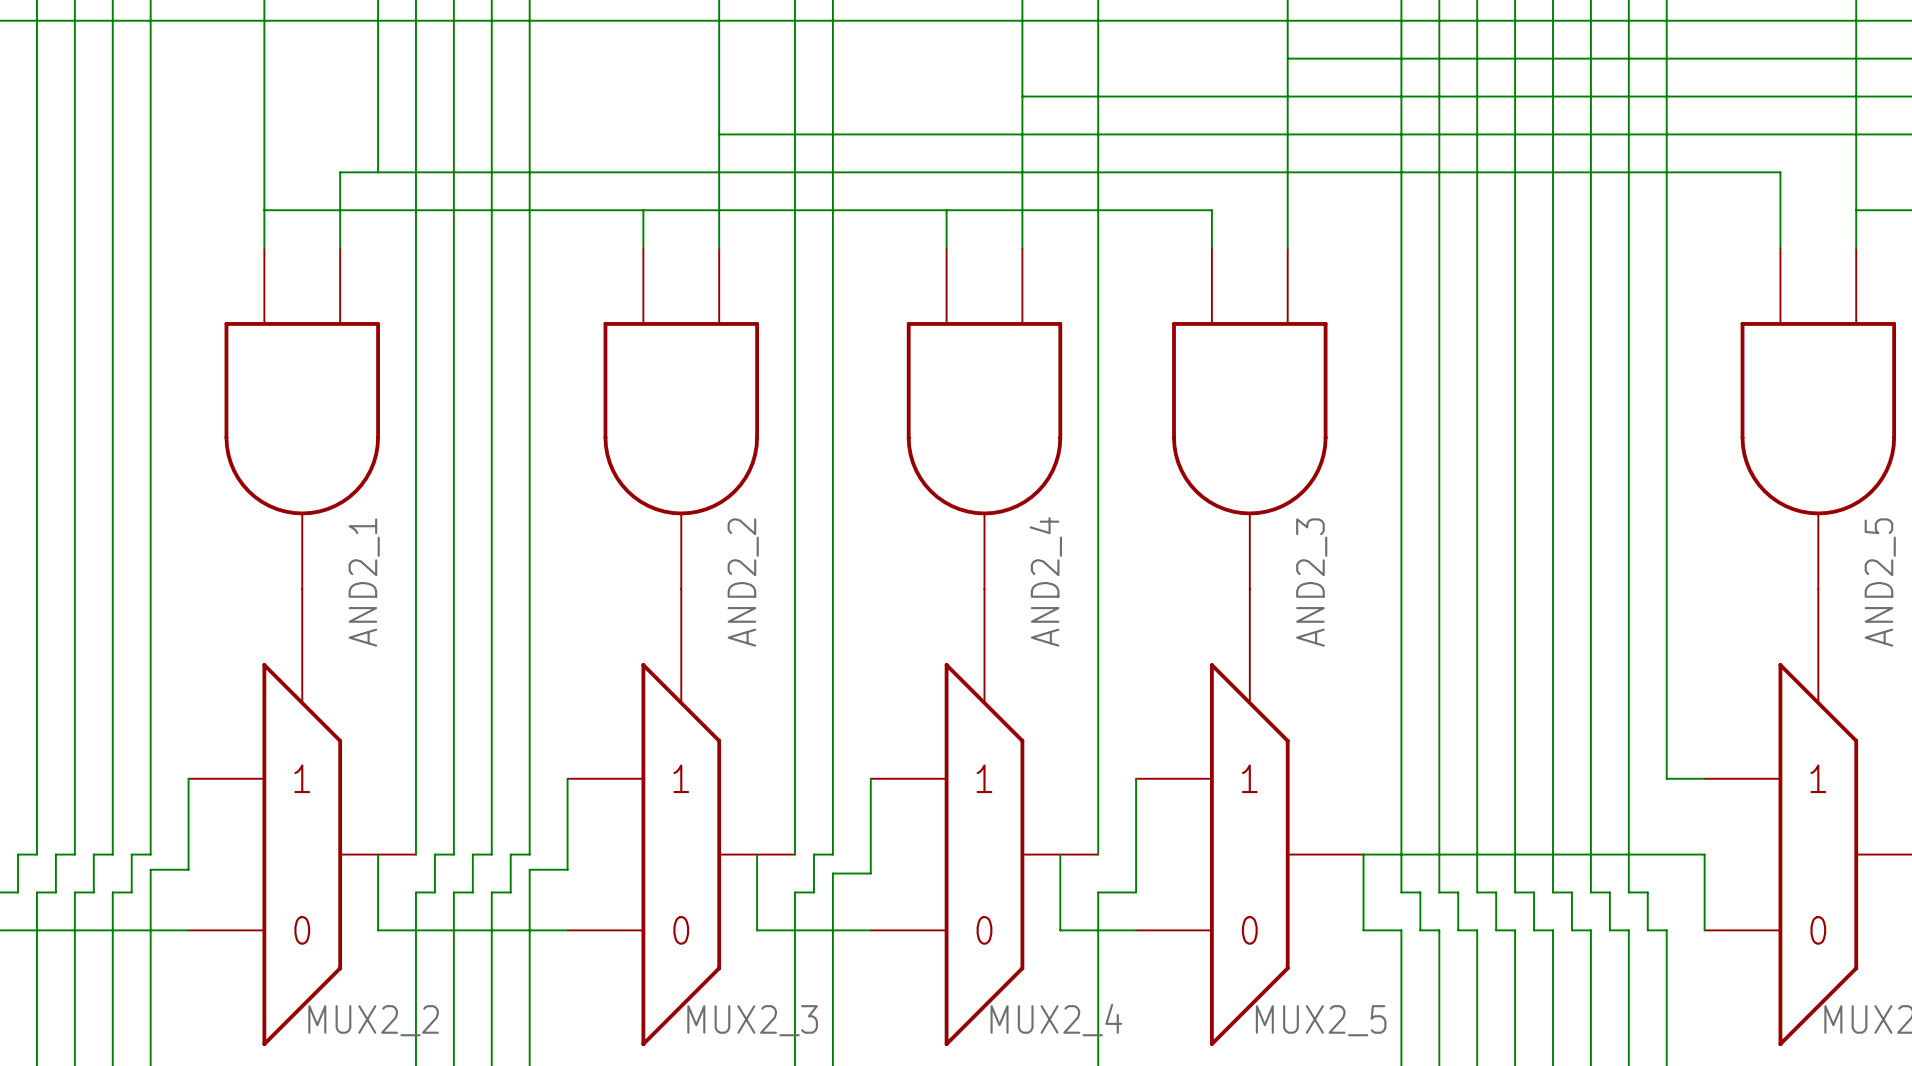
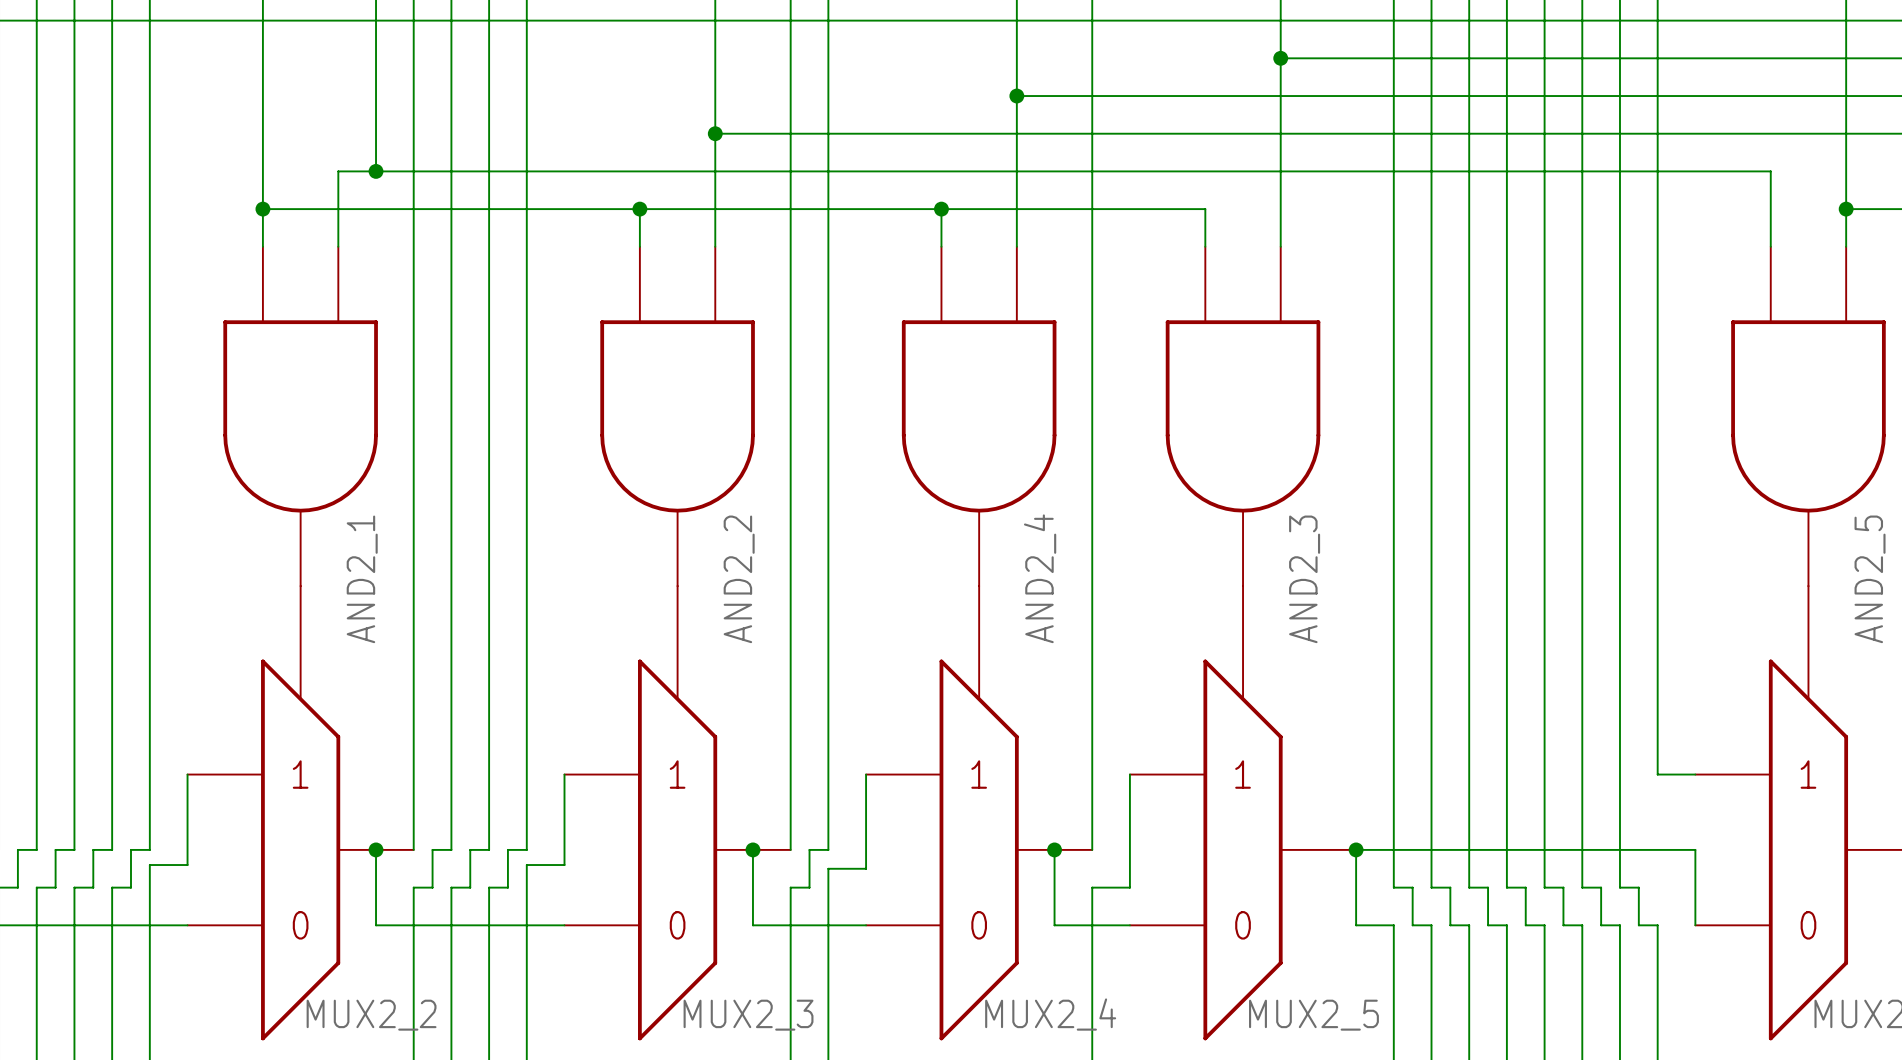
junction: none -> (1280, 58)
junction: none -> (1016, 96)
junction: none -> (715, 133)
junction: none -> (376, 171)
junction: none -> (262, 209)
junction: none -> (639, 209)
junction: none -> (941, 209)
junction: none -> (1846, 209)
junction: none -> (376, 849)
junction: none -> (752, 849)
junction: none -> (1054, 849)
junction: none -> (1356, 849)

